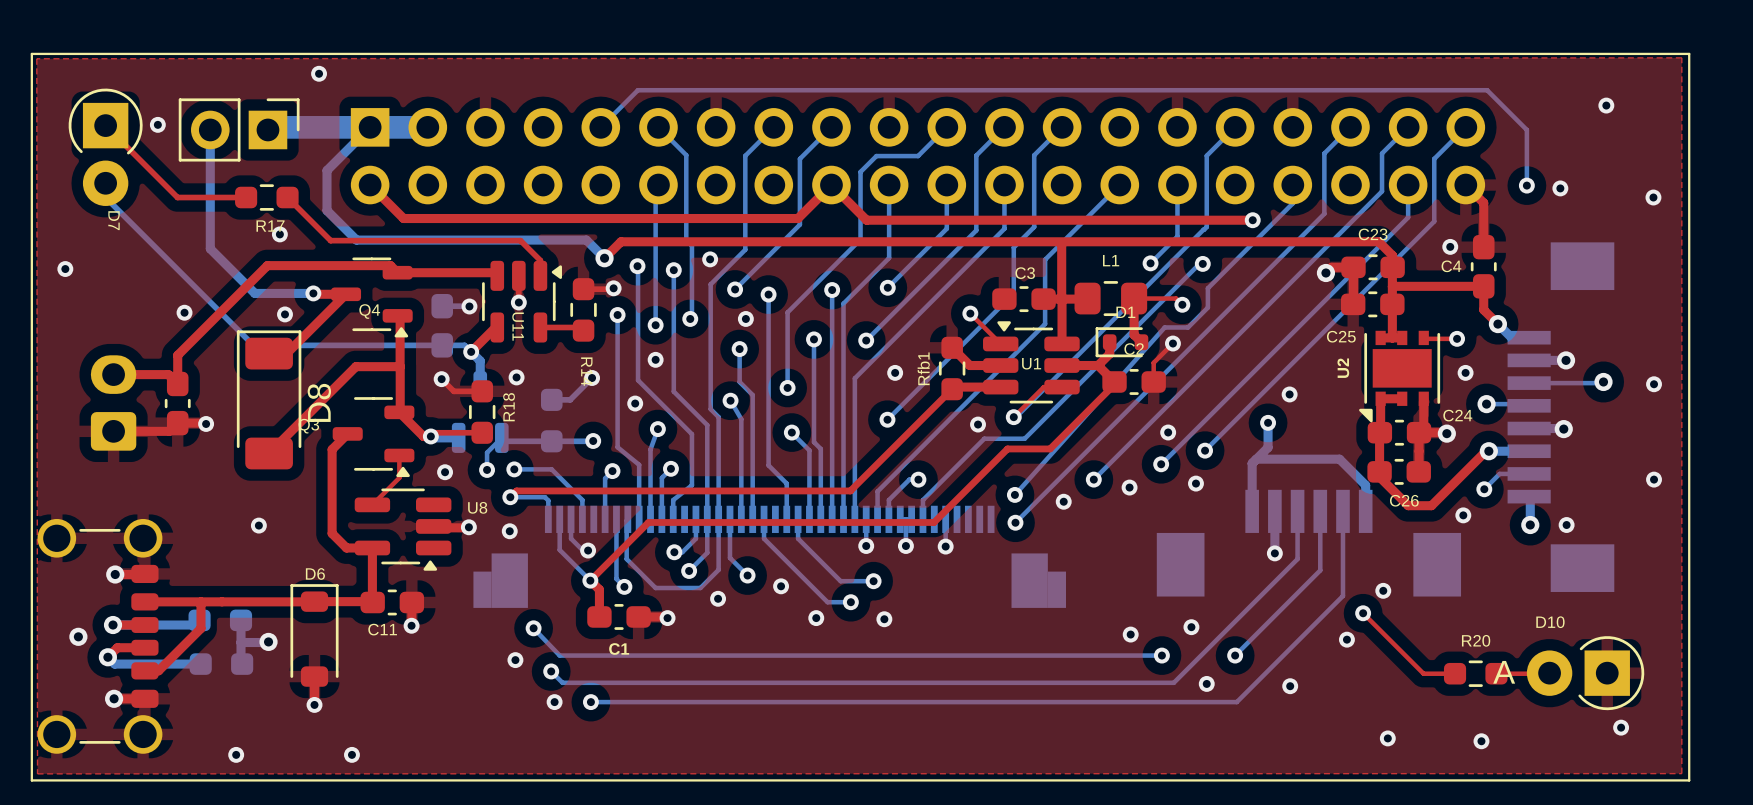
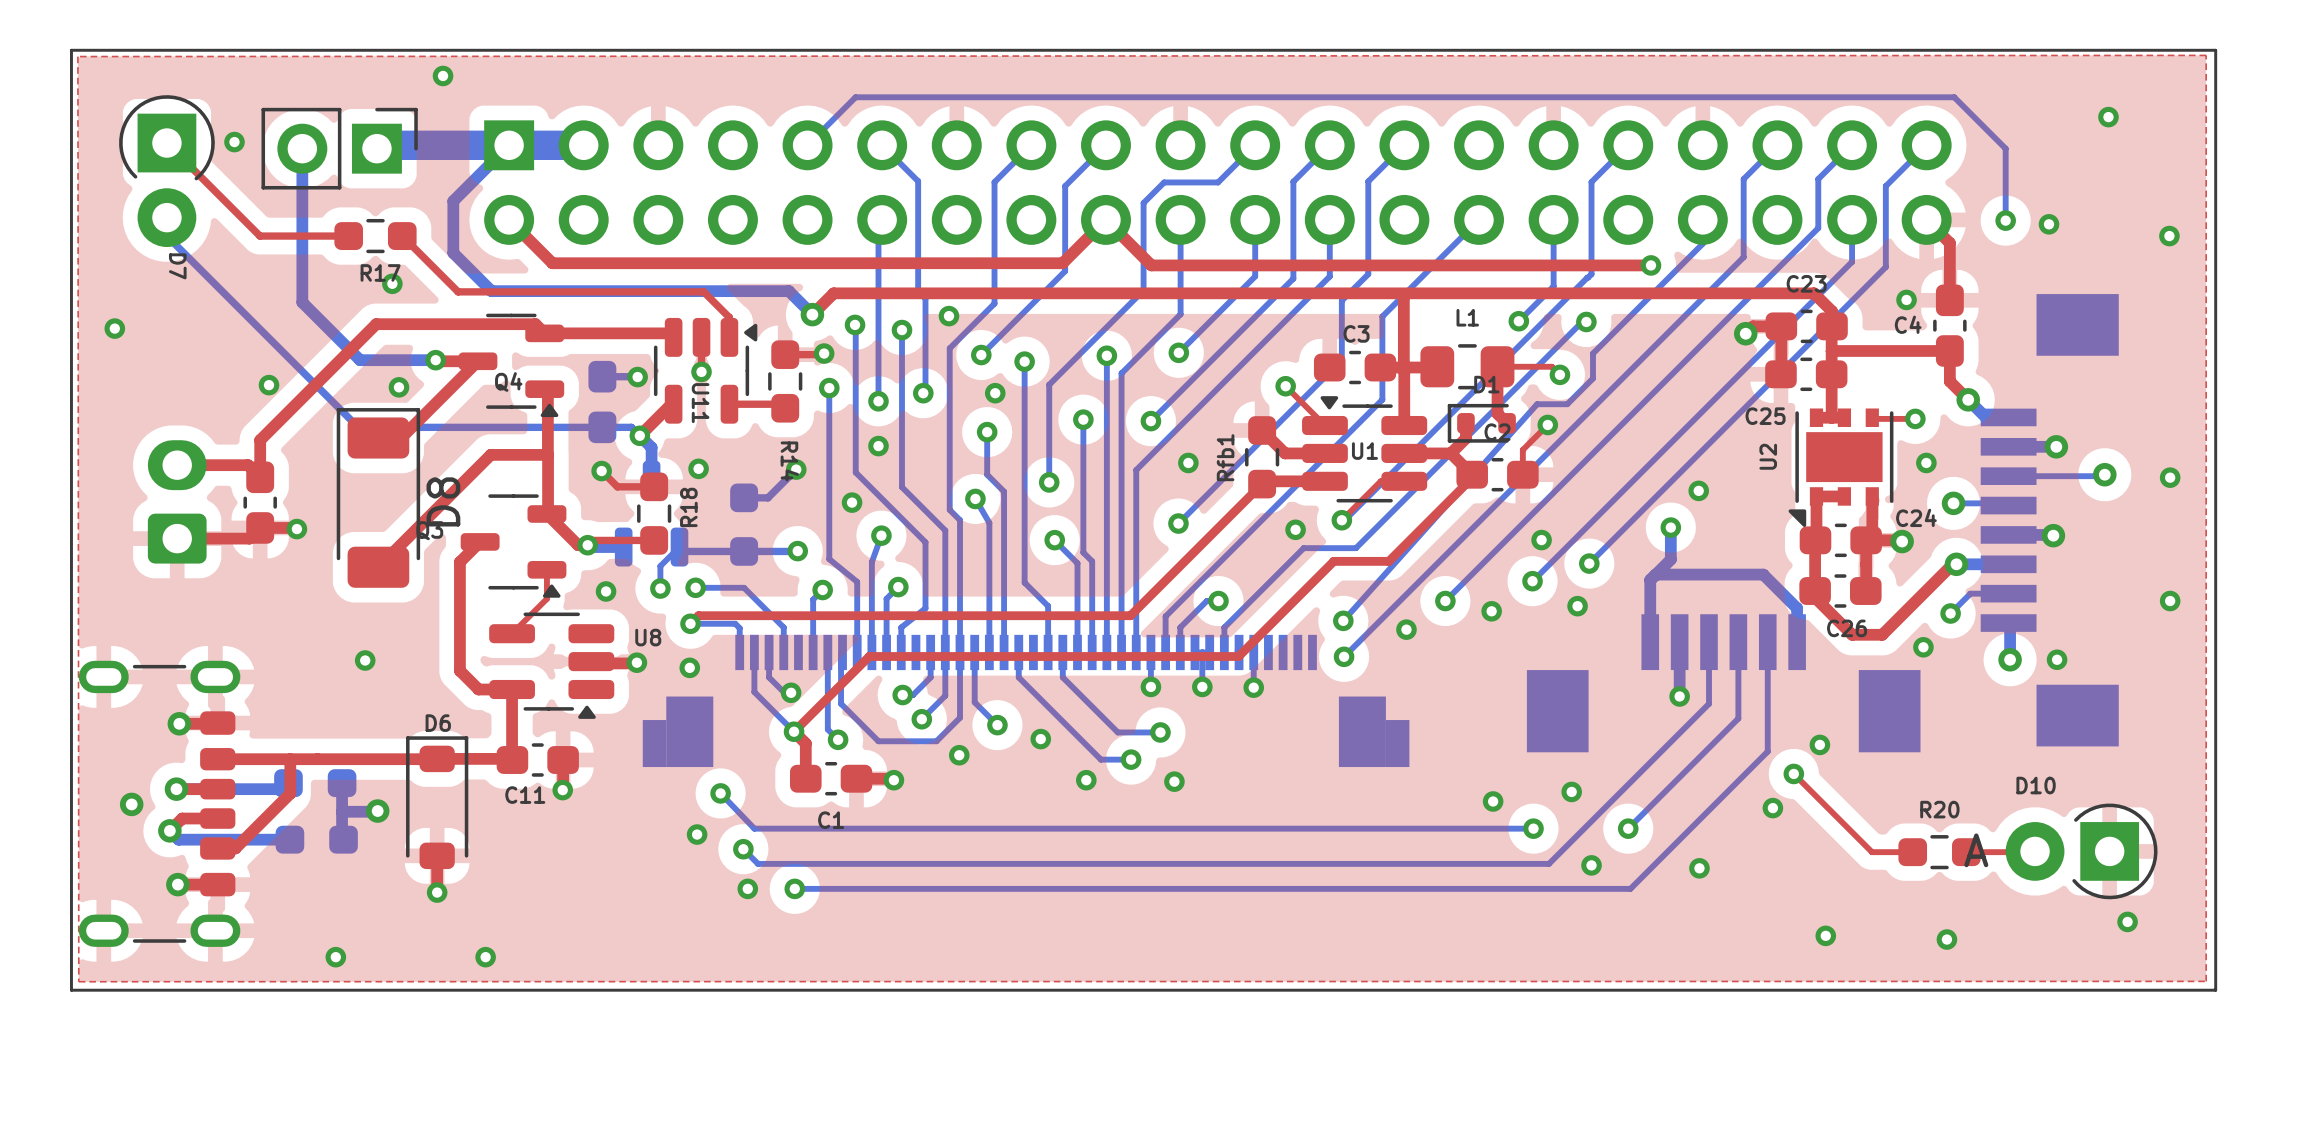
part footprint: [37, 518, 163, 754] -> [78, 660, 241, 947]

